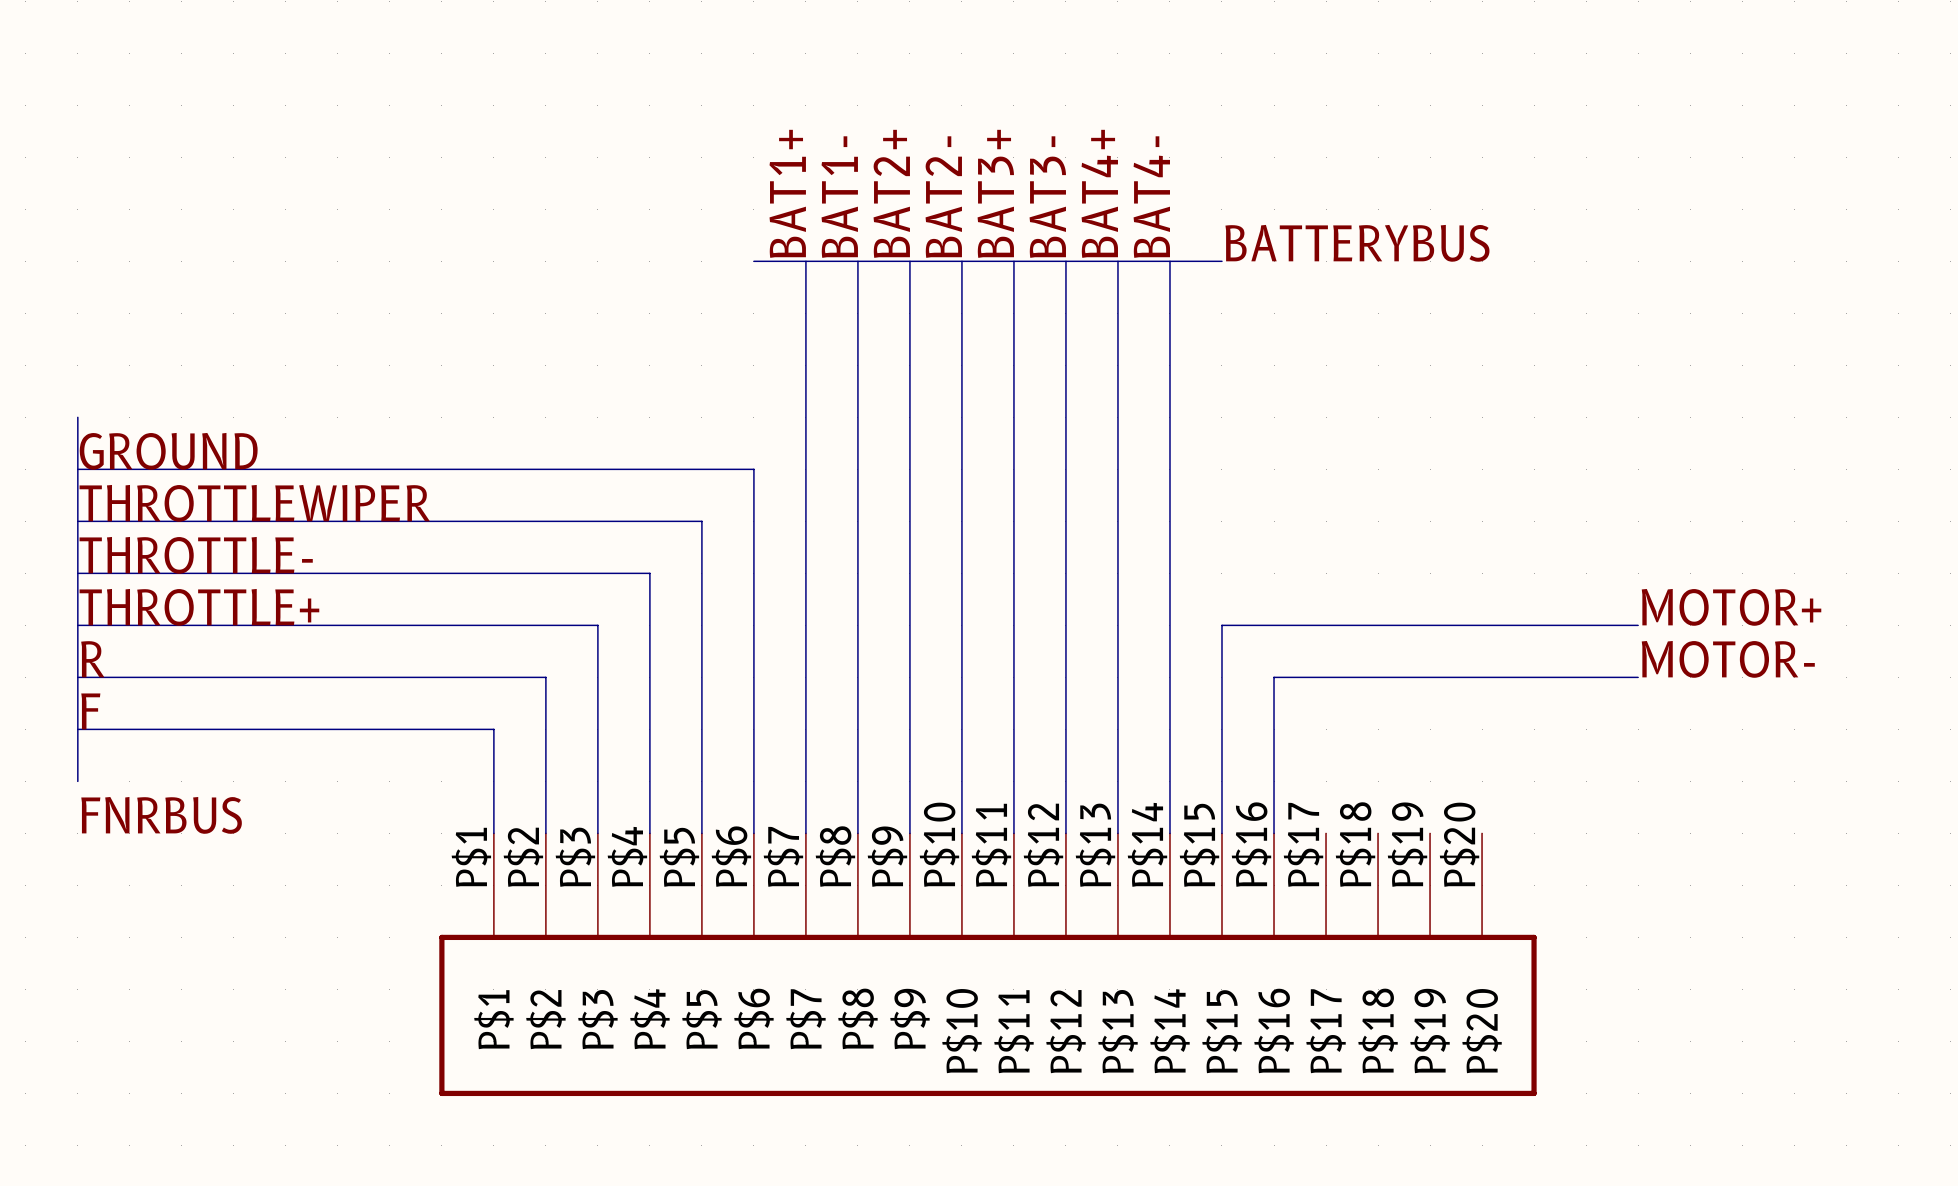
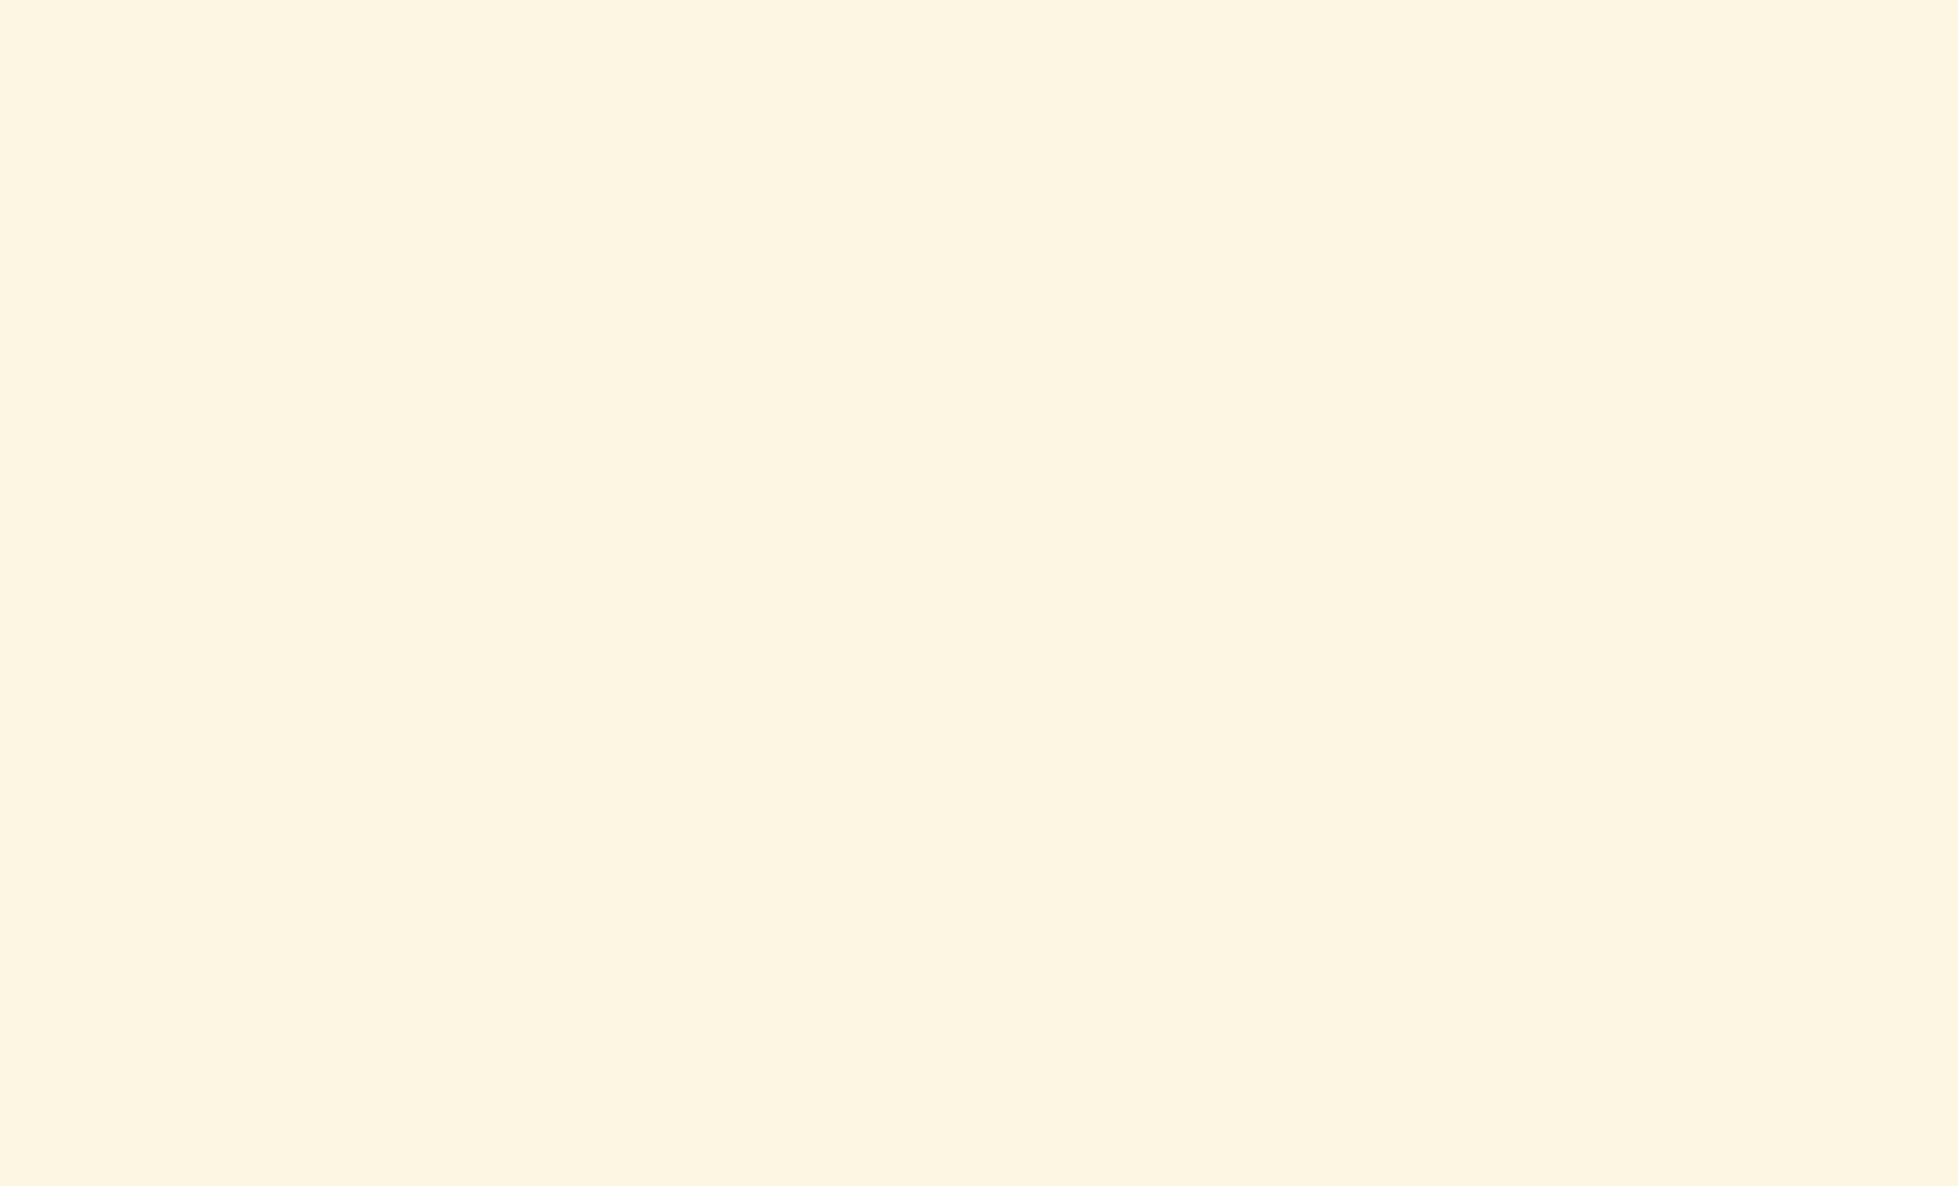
label: BAT1+ (787, 193) -> none
label: BAT2+ (891, 193) -> none
label: BAT3+ (995, 193) -> none
label: BAT4+ (1099, 193) -> none
label: BAT1- (839, 197) -> none
label: BAT2- (943, 197) -> none
label: BAT3- (1047, 197) -> none
label: BAT4- (1151, 197) -> none
label: BATTERYBUS (1357, 243) -> none
bus: (753, 261) (1221, 261) -> none
wire: (805, 261) (805, 833) -> none
wire: (857, 261) (857, 833) -> none
wire: (909, 261) (909, 833) -> none
wire: (961, 261) (961, 833) -> none
wire: (1013, 261) (1013, 833) -> none
wire: (1065, 261) (1065, 833) -> none
wire: (1117, 261) (1117, 833) -> none
wire: (1169, 261) (1169, 833) -> none
bus: (77, 417) (77, 781) -> none
label: GROUND (168, 451) -> none
wire: (77, 469) (753, 469) (753, 833) -> none
label: THROTTLEWIPER (254, 503) -> none
wire: (77, 521) (701, 521) (701, 833) -> none
label: THROTTLE- (196, 555) -> none
wire: (77, 573) (649, 573) (649, 833) -> none
label: THROTTLE+ (199, 607) -> none
label: MOTOR+ (1731, 607) -> none
wire: (77, 625) (597, 625) (597, 833) -> none
wire: (1638, 625) (1221, 625) (1221, 833) -> none
label: R (92, 659) -> none
label: MOTOR- (1728, 659) -> none
wire: (77, 677) (545, 677) (545, 833) -> none
wire: (1638, 677) (1274, 677) (1274, 833) -> none
label: F (90, 711) -> none
wire: (77, 729) (493, 729) (493, 833) -> none
label: FNRBUS (161, 815) -> none
part: (987, 964) -> none

